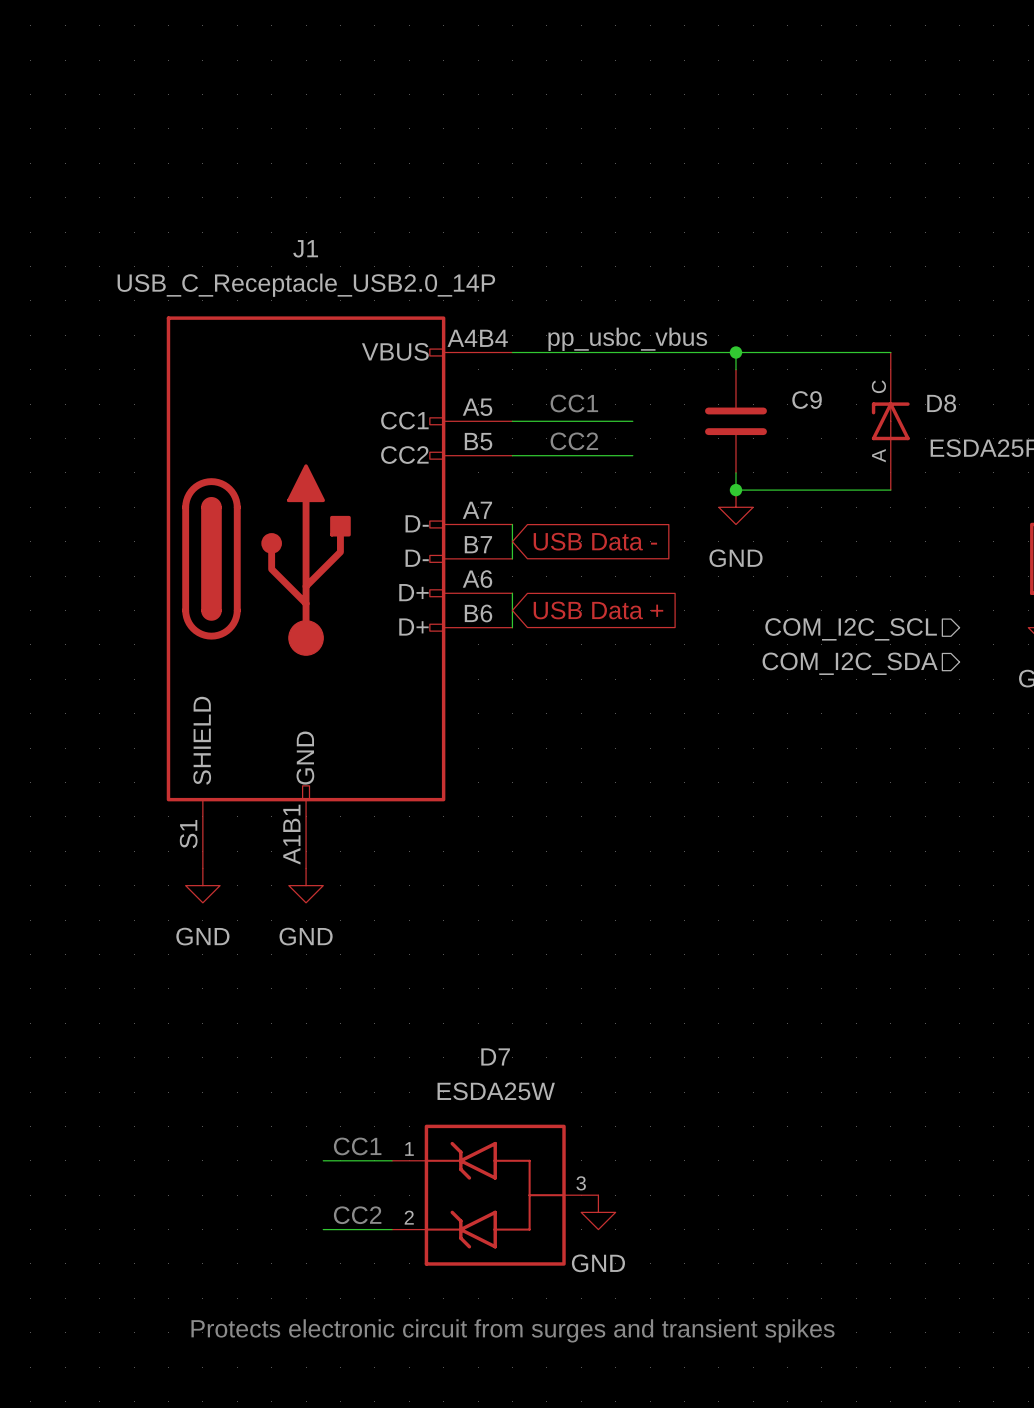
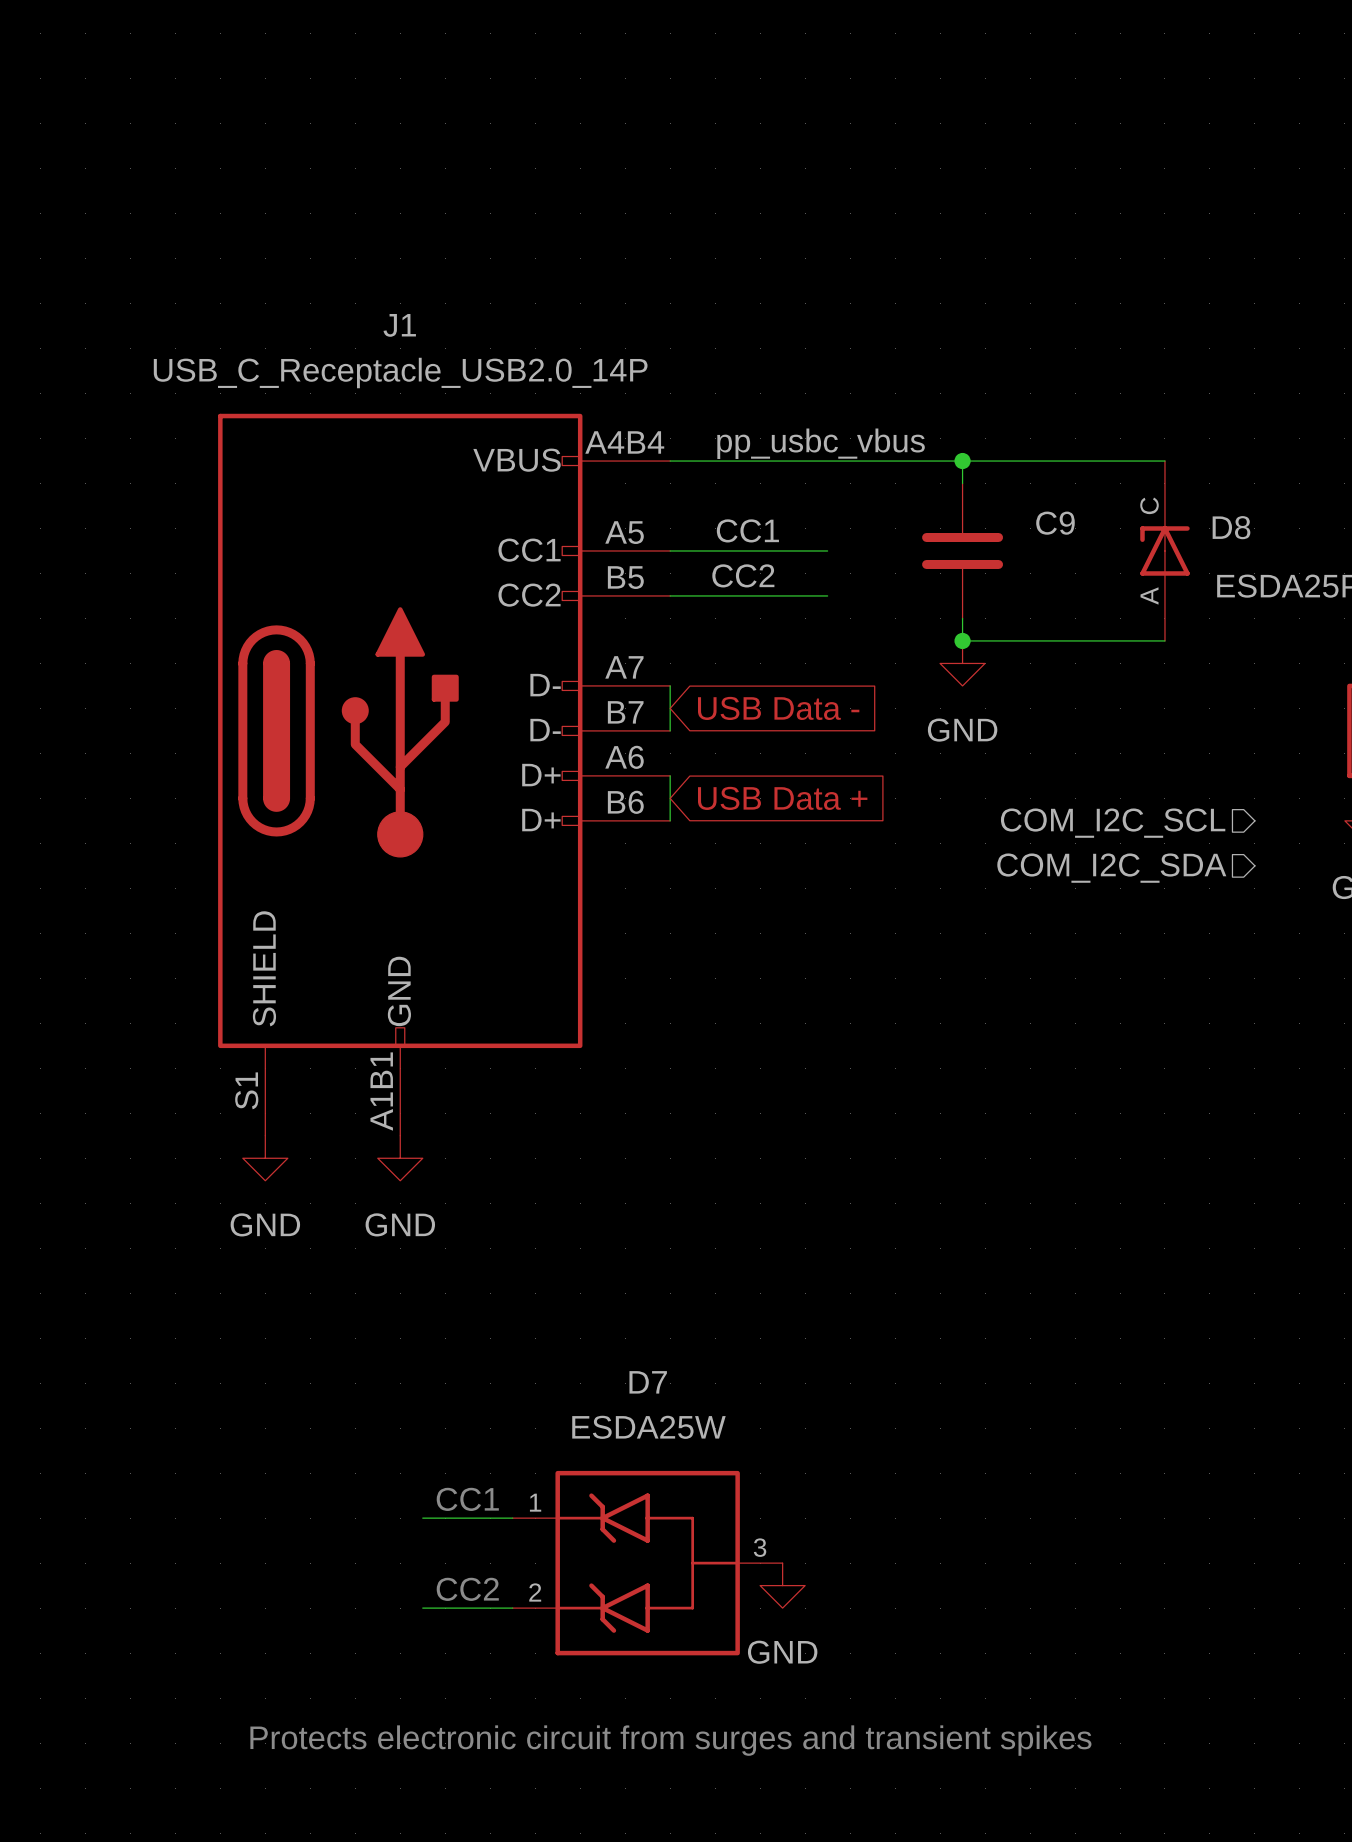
text: CC1 (574, 403) -> none
label: none -> CC1 (747, 530)
label: none -> CC2 (743, 575)
text: CC2 (574, 441) -> none

